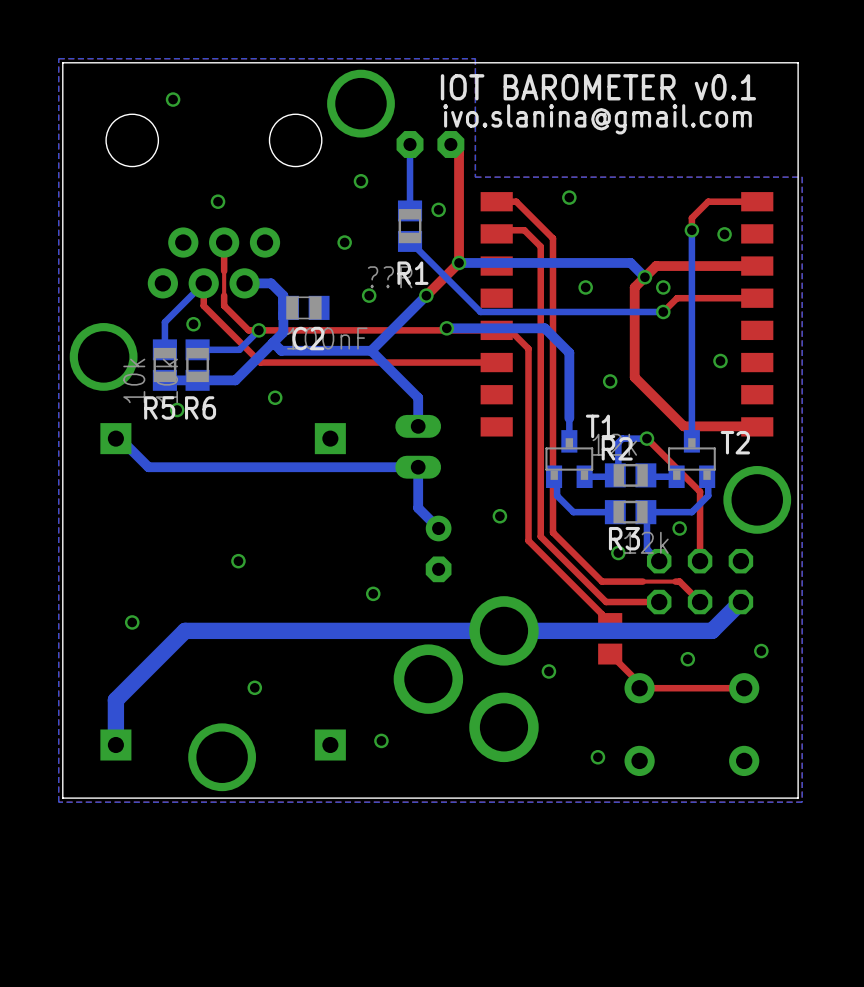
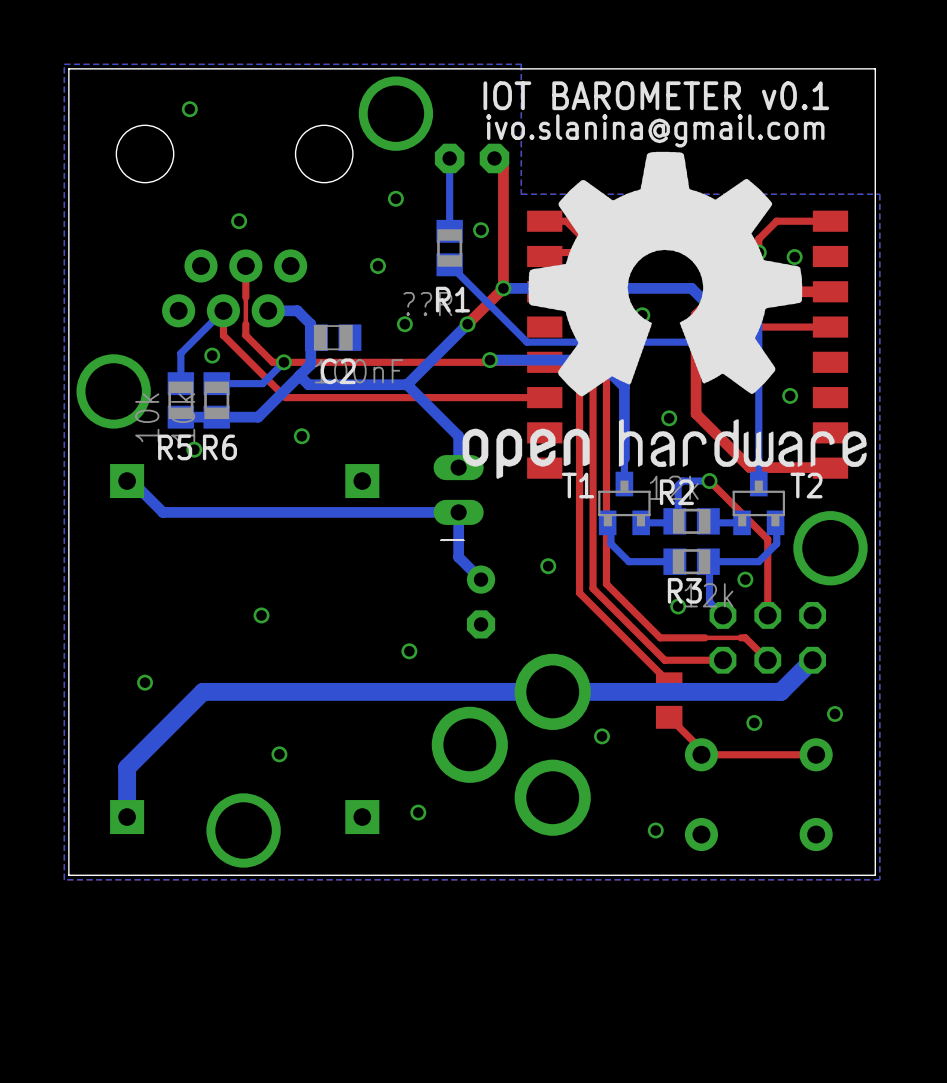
drawing: none -> [462, 151, 867, 479]
T1 name position: T1 (600, 426) -> T1 (577, 485)

